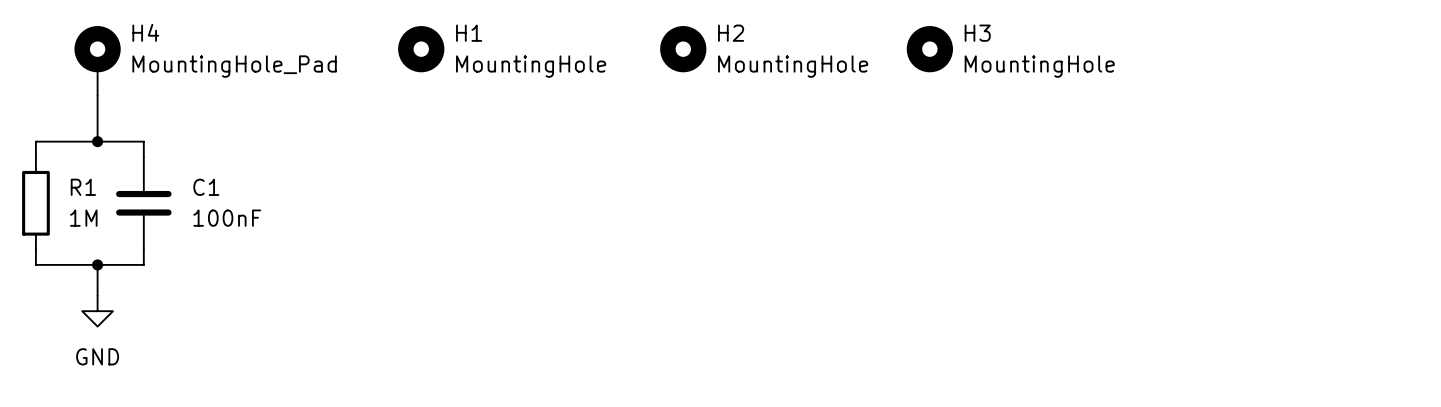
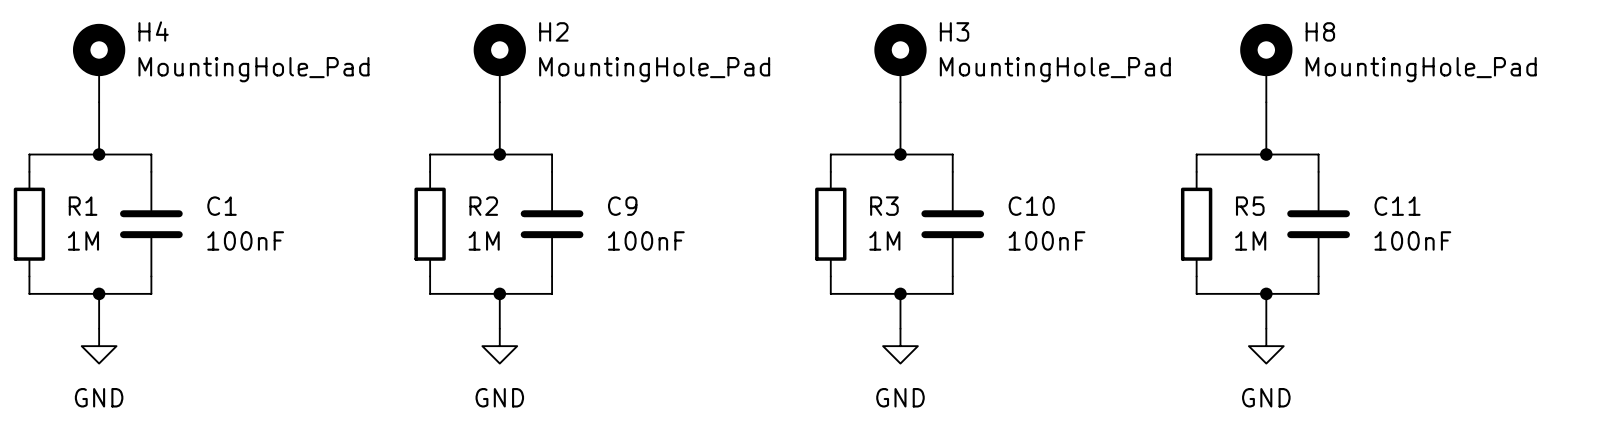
H2 symbol: [660, 26, 707, 73] -> [473, 23, 526, 103]
H3 symbol: [906, 26, 953, 73] -> [874, 23, 927, 103]
H1: MountingHole (421, 49) -> none
H8: none -> MountingHole_Pad (1266, 63)
H2 value: MountingHole (793, 66) -> MountingHole_Pad (654, 69)
H3 value: MountingHole (1039, 66) -> MountingHole_Pad (1055, 69)
wire: none -> (499, 102) (499, 154)
wire: none -> (900, 102) (900, 154)
wire: none -> (1266, 102) (1266, 154)
junction: none -> (499, 154)
junction: none -> (900, 154)
junction: none -> (1266, 154)
wire: none -> (430, 171) (430, 154) (552, 154) (552, 171)
wire: none -> (830, 171) (830, 154) (952, 154) (952, 171)
wire: none -> (1196, 171) (1196, 154) (1318, 154) (1318, 171)
R2: none -> 1M (430, 224)
C9: none -> 100nF (552, 224)
R3: none -> 1M (830, 224)
C10: none -> 100nF (952, 224)
R5: none -> 1M (1196, 224)
C11: none -> 100nF (1318, 224)
wire: none -> (430, 276) (430, 293) (552, 293) (552, 276)
wire: none -> (830, 276) (830, 293) (952, 293) (952, 276)
wire: none -> (1196, 276) (1196, 293) (1318, 293) (1318, 276)
wire: none -> (499, 293) (499, 328)
junction: none -> (499, 293)
wire: none -> (900, 293) (900, 328)
junction: none -> (900, 293)
wire: none -> (1266, 293) (1266, 328)
junction: none -> (1266, 293)
power symbol: none -> GND (499, 346)
power symbol: none -> GND (900, 346)
power symbol: none -> GND (1266, 346)

